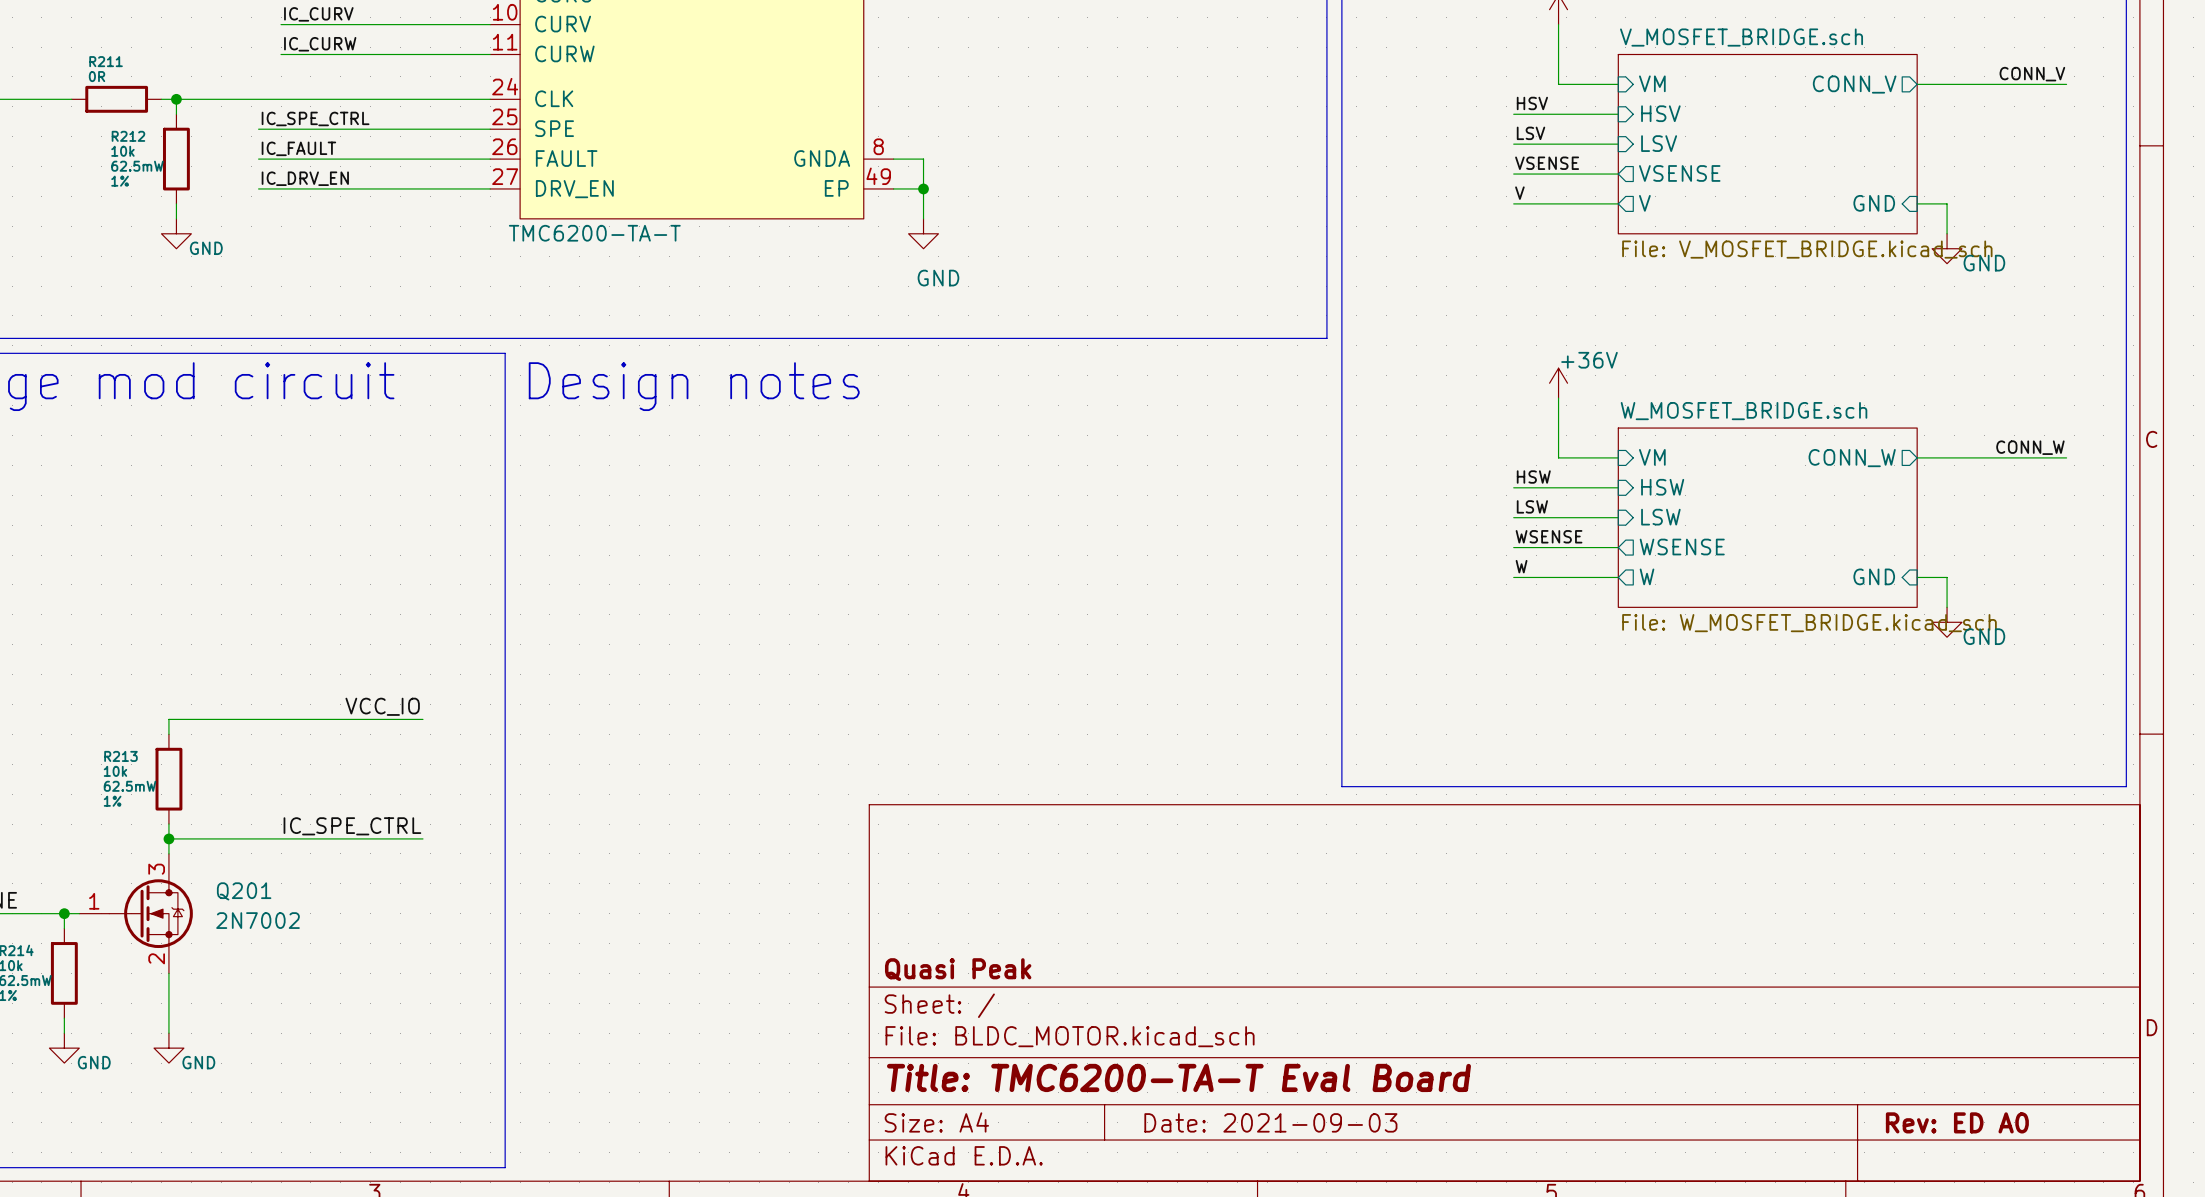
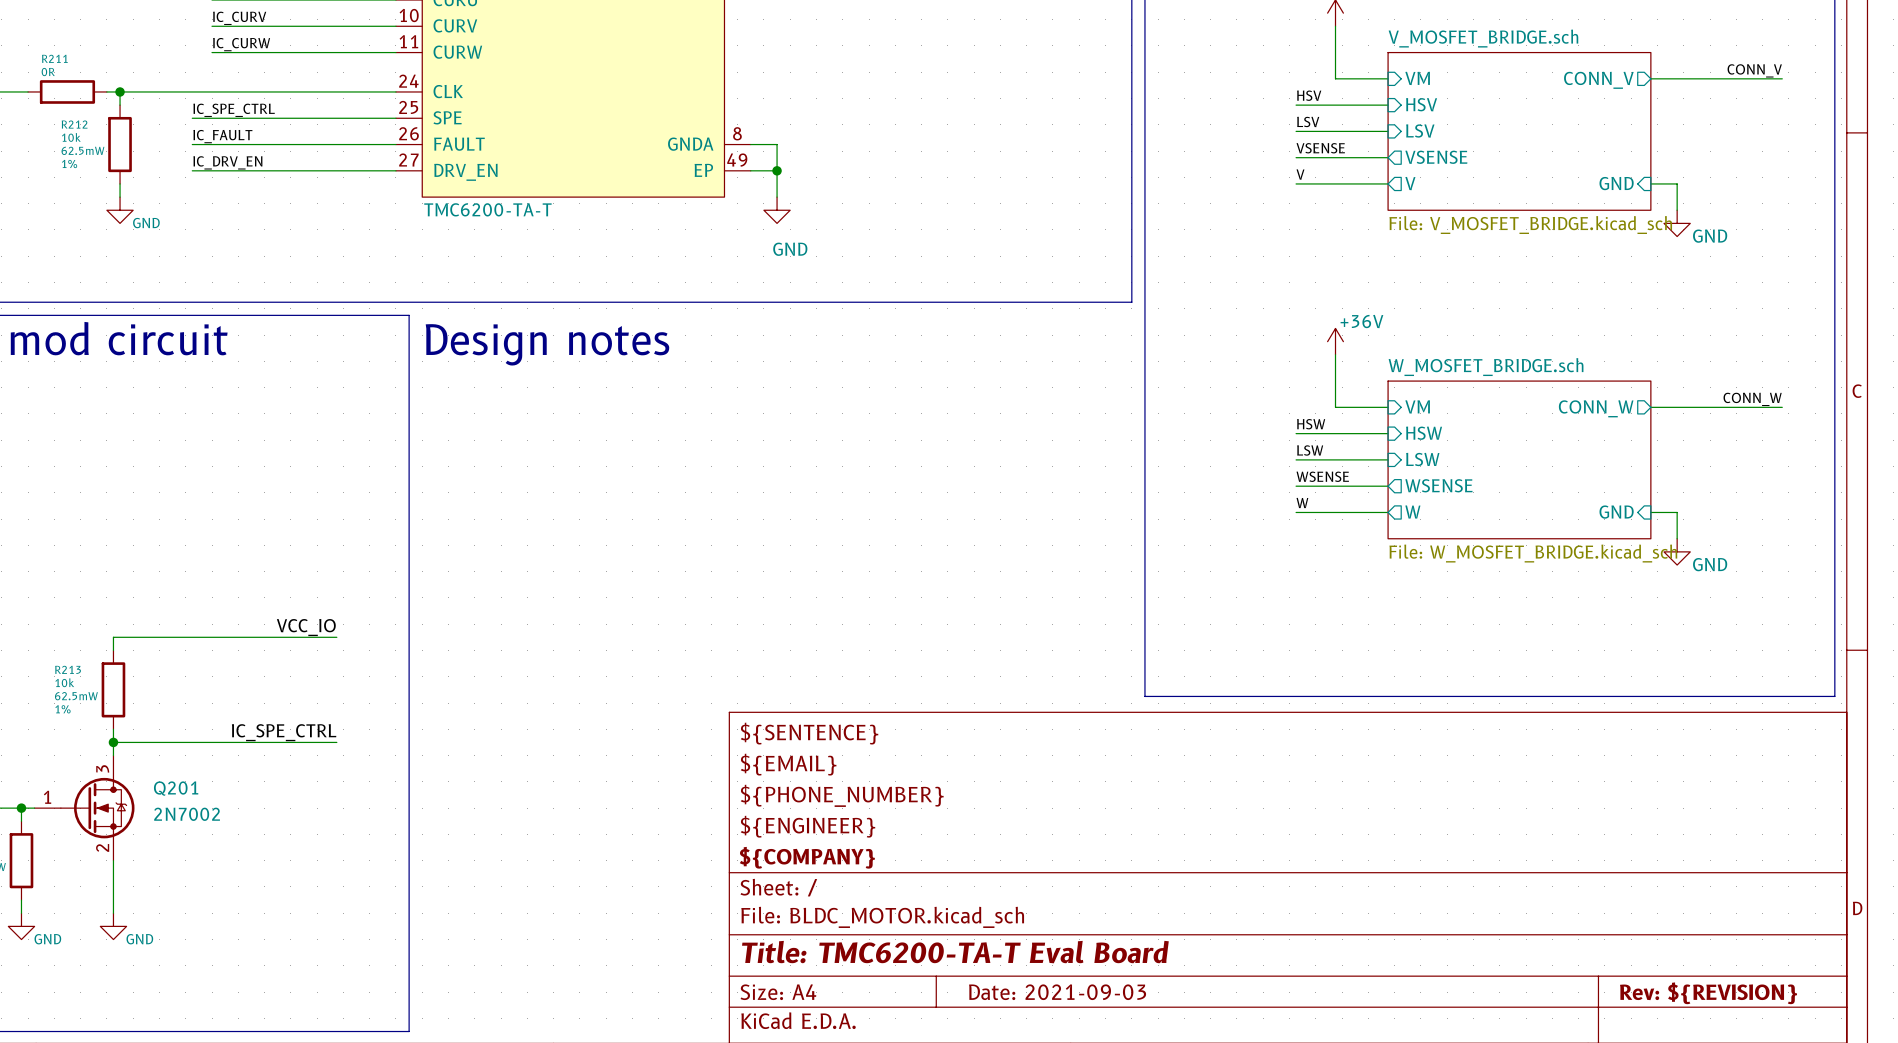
title block: none -> ${SENTENCE} (809, 733)
title block: none -> ${EMAIL} (788, 764)
title block: none -> ${PHONE_NUMBER} (842, 795)
title block: none -> ${ENGINEER} (807, 826)
title block: Quasi Peak (958, 969) -> ${COMPANY} (807, 857)
title block: Rev: ED A0 (1957, 1122) -> Rev: ${REVISION} (1708, 993)

